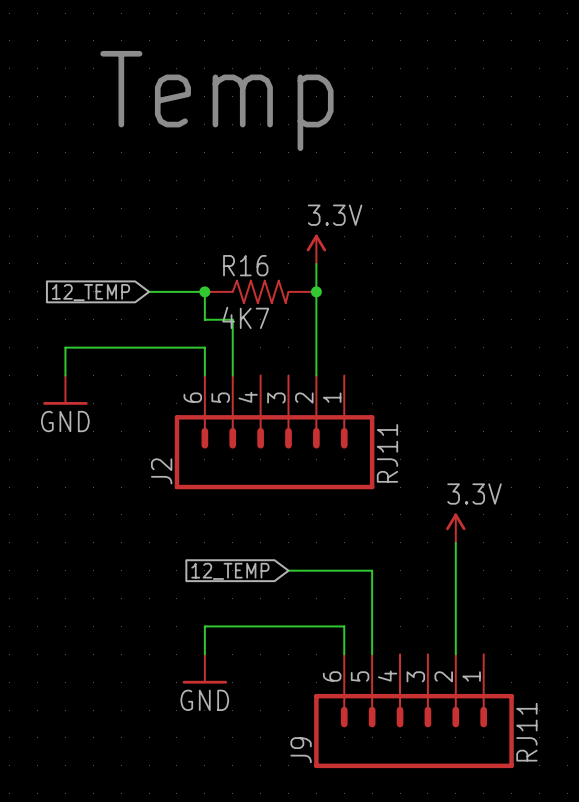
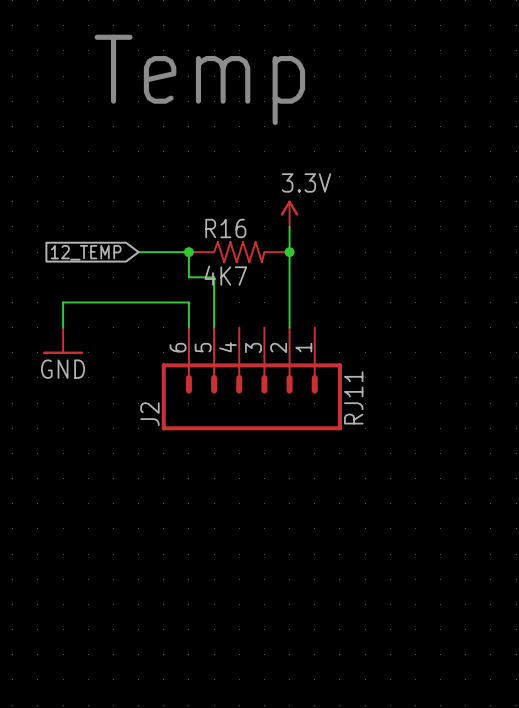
power symbol: 3.3V (455, 528) -> none
wire: (455, 542) (455, 654) -> none
wire: (288, 570) (372, 570) (372, 654) -> none
global label: 12_TEMP (230, 571) -> none
wire: (204, 654) (204, 626) (344, 626) (344, 654) -> none
power symbol: GND (204, 668) -> none
J9: RJ11 (413, 711) -> none

